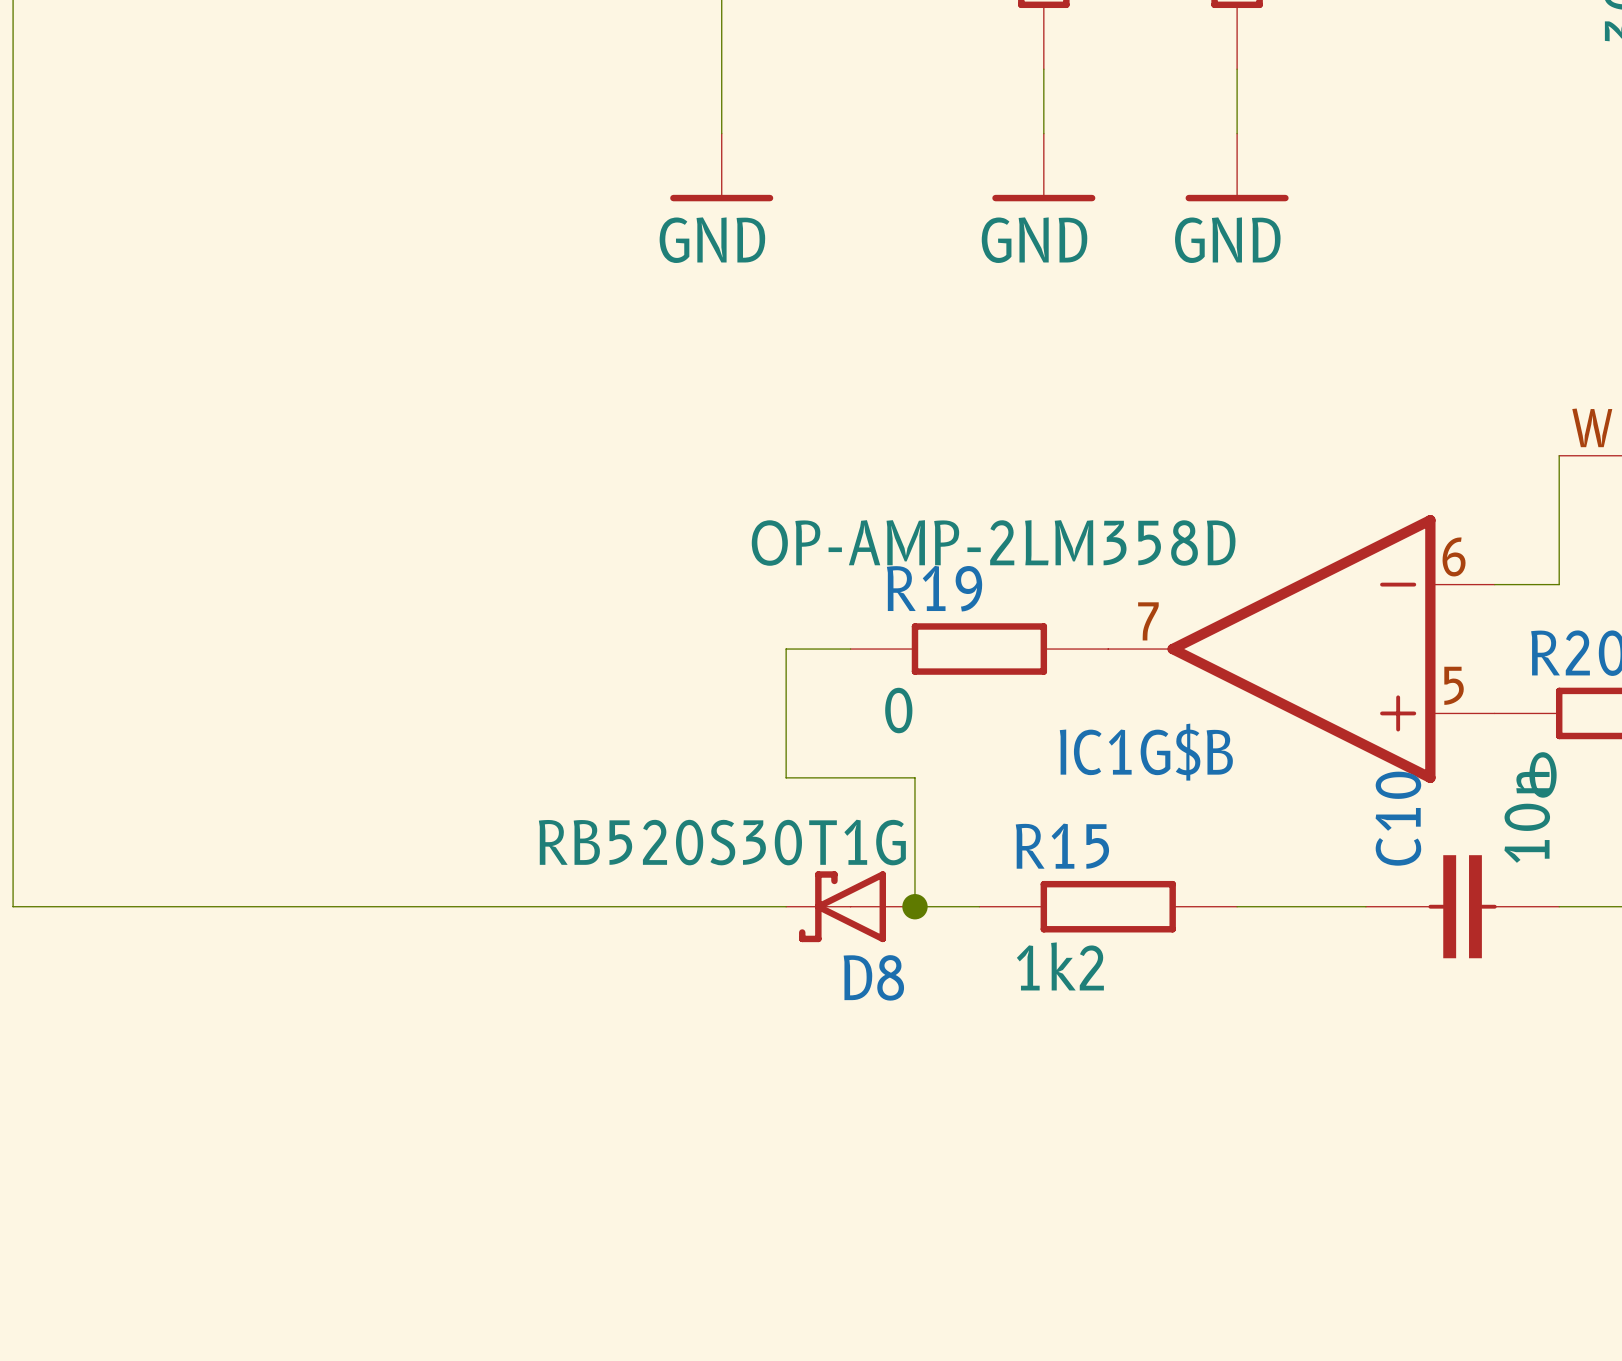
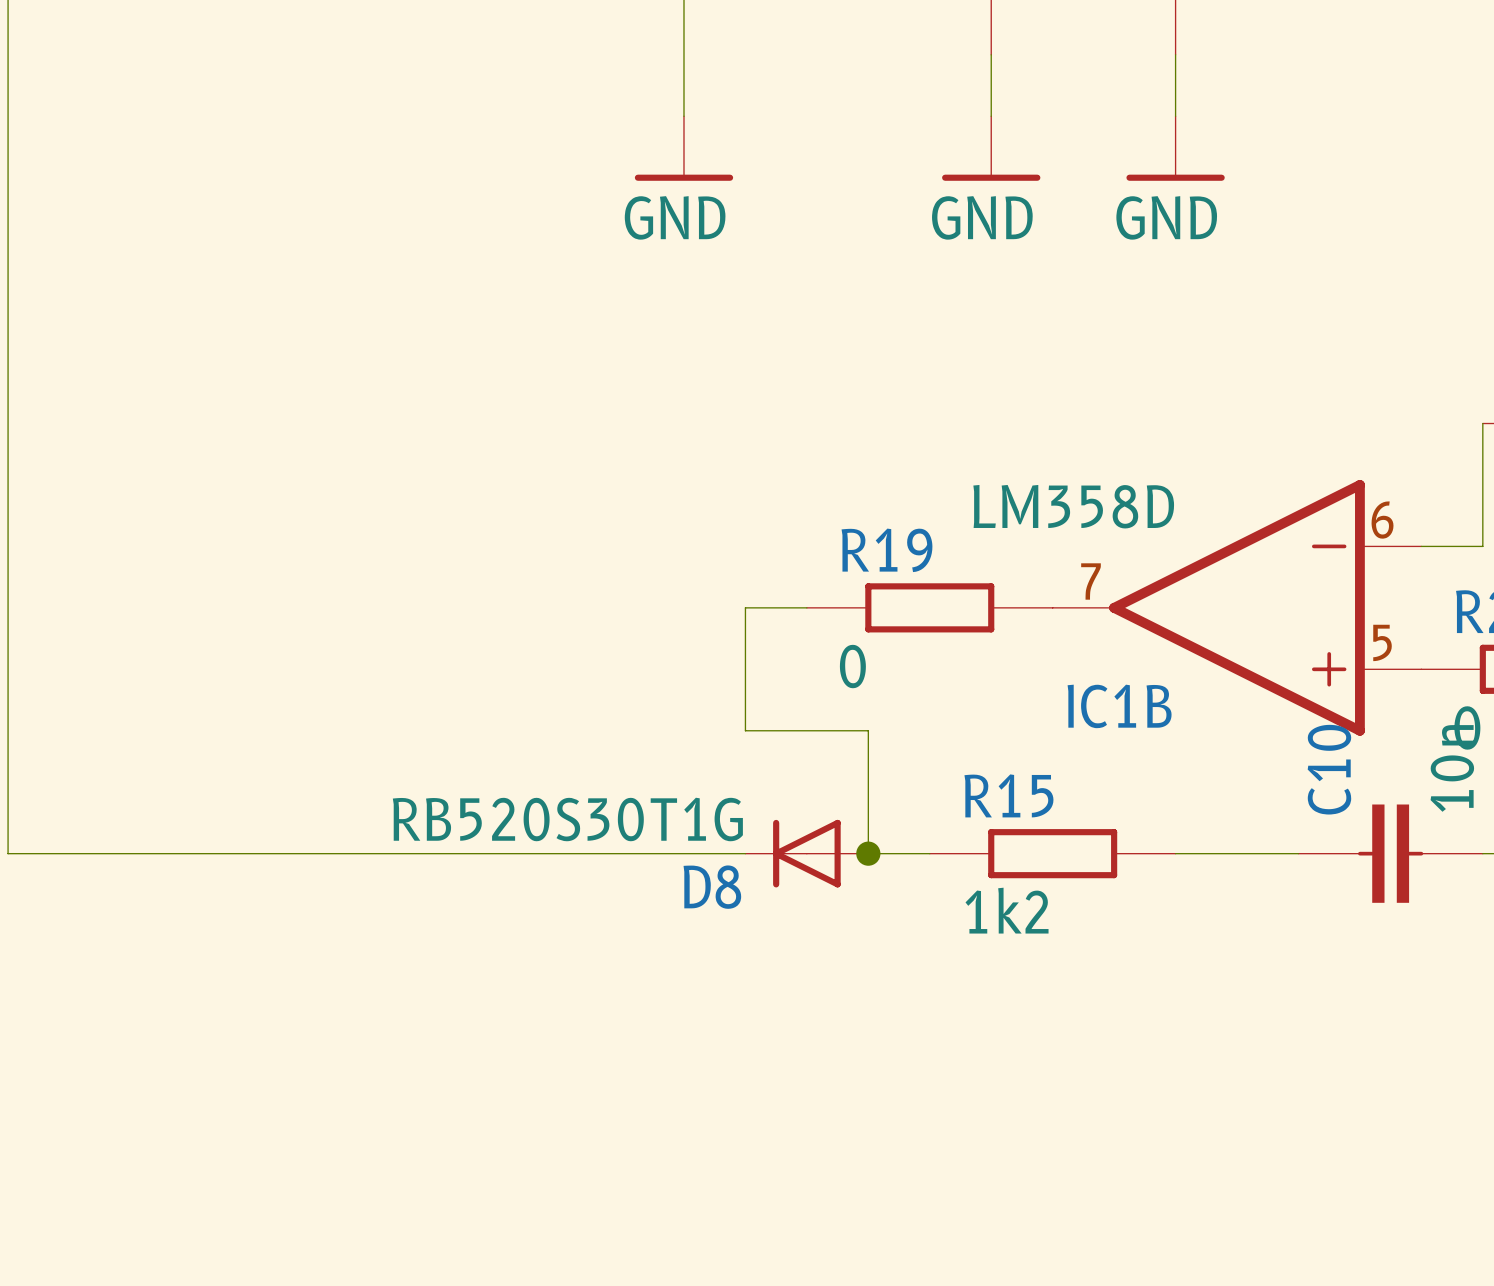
IC1G$B value: OP-AMP-2LM358D (993, 542) -> LM358D (1073, 506)
IC1G$B name: IC1G$B (1146, 752) -> IC1B (1119, 706)
D8 value position: RB520S30T1G (722, 842) -> RB520S30T1G (567, 819)
D8 symbol: [786, 871, 915, 943] -> [745, 819, 869, 888]
D8 name position: D8 (873, 977) -> D8 (712, 887)

